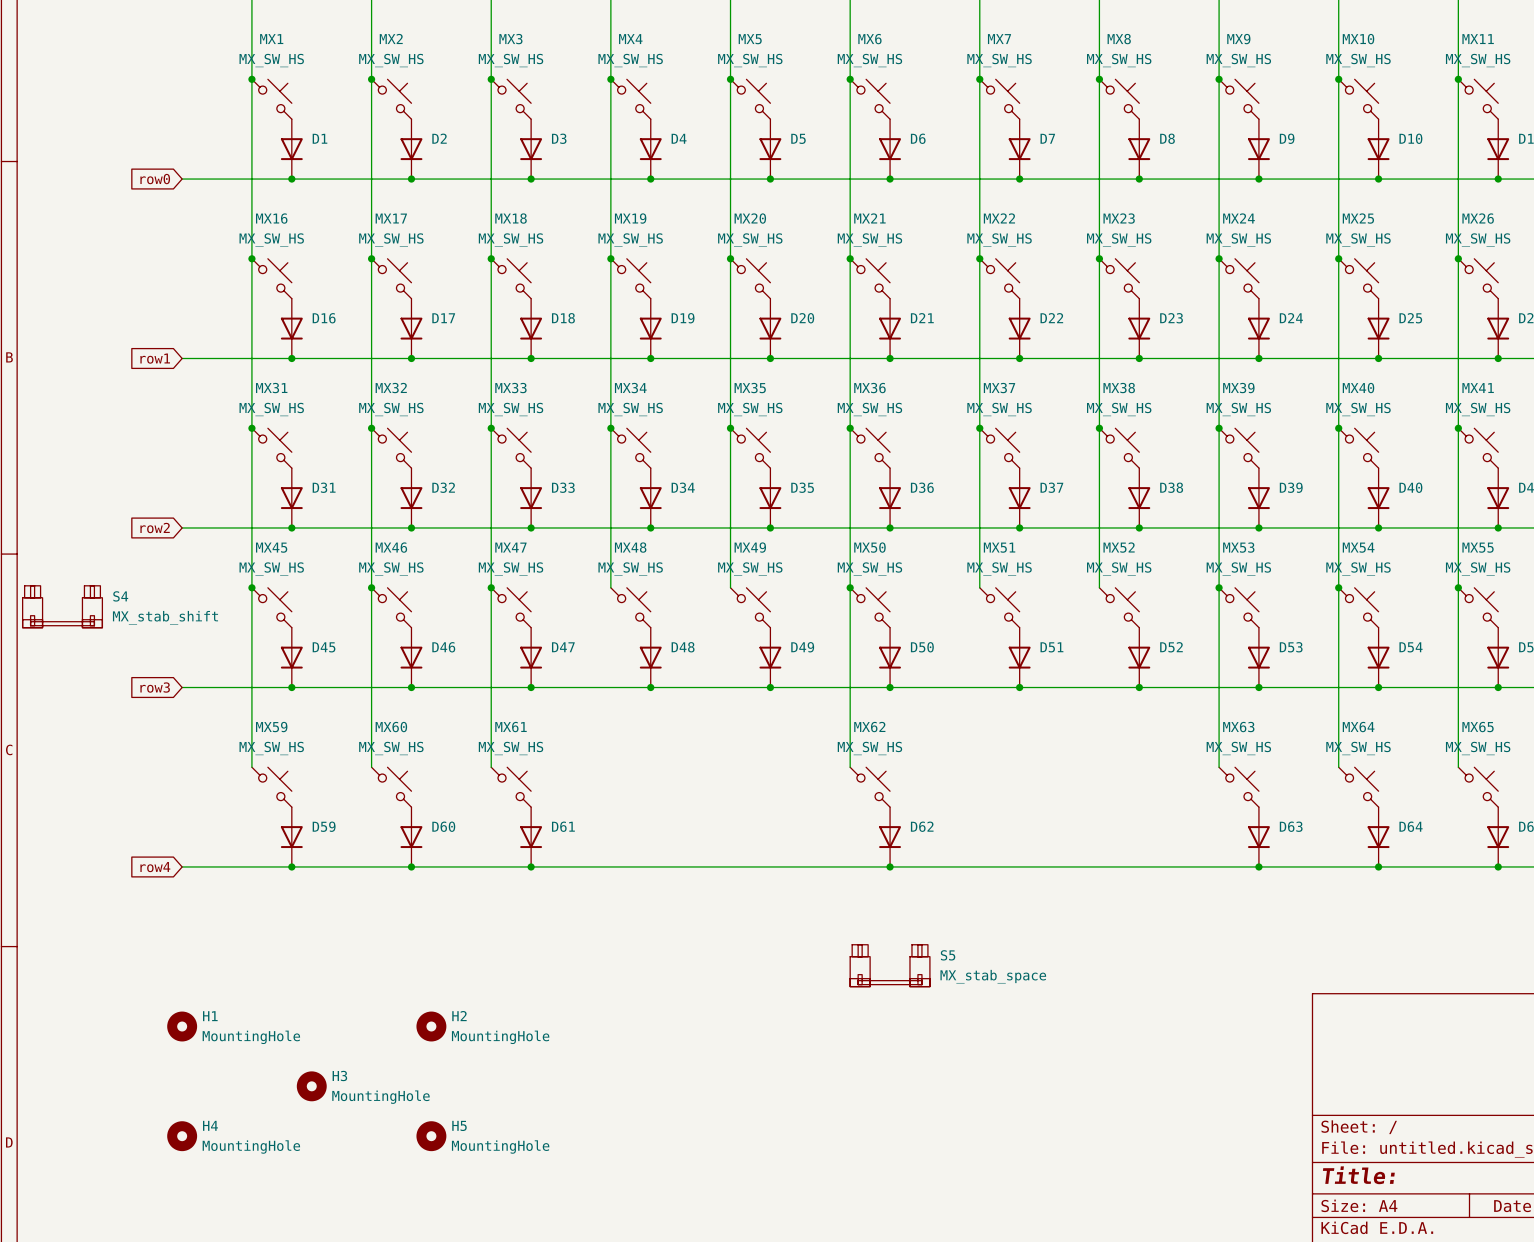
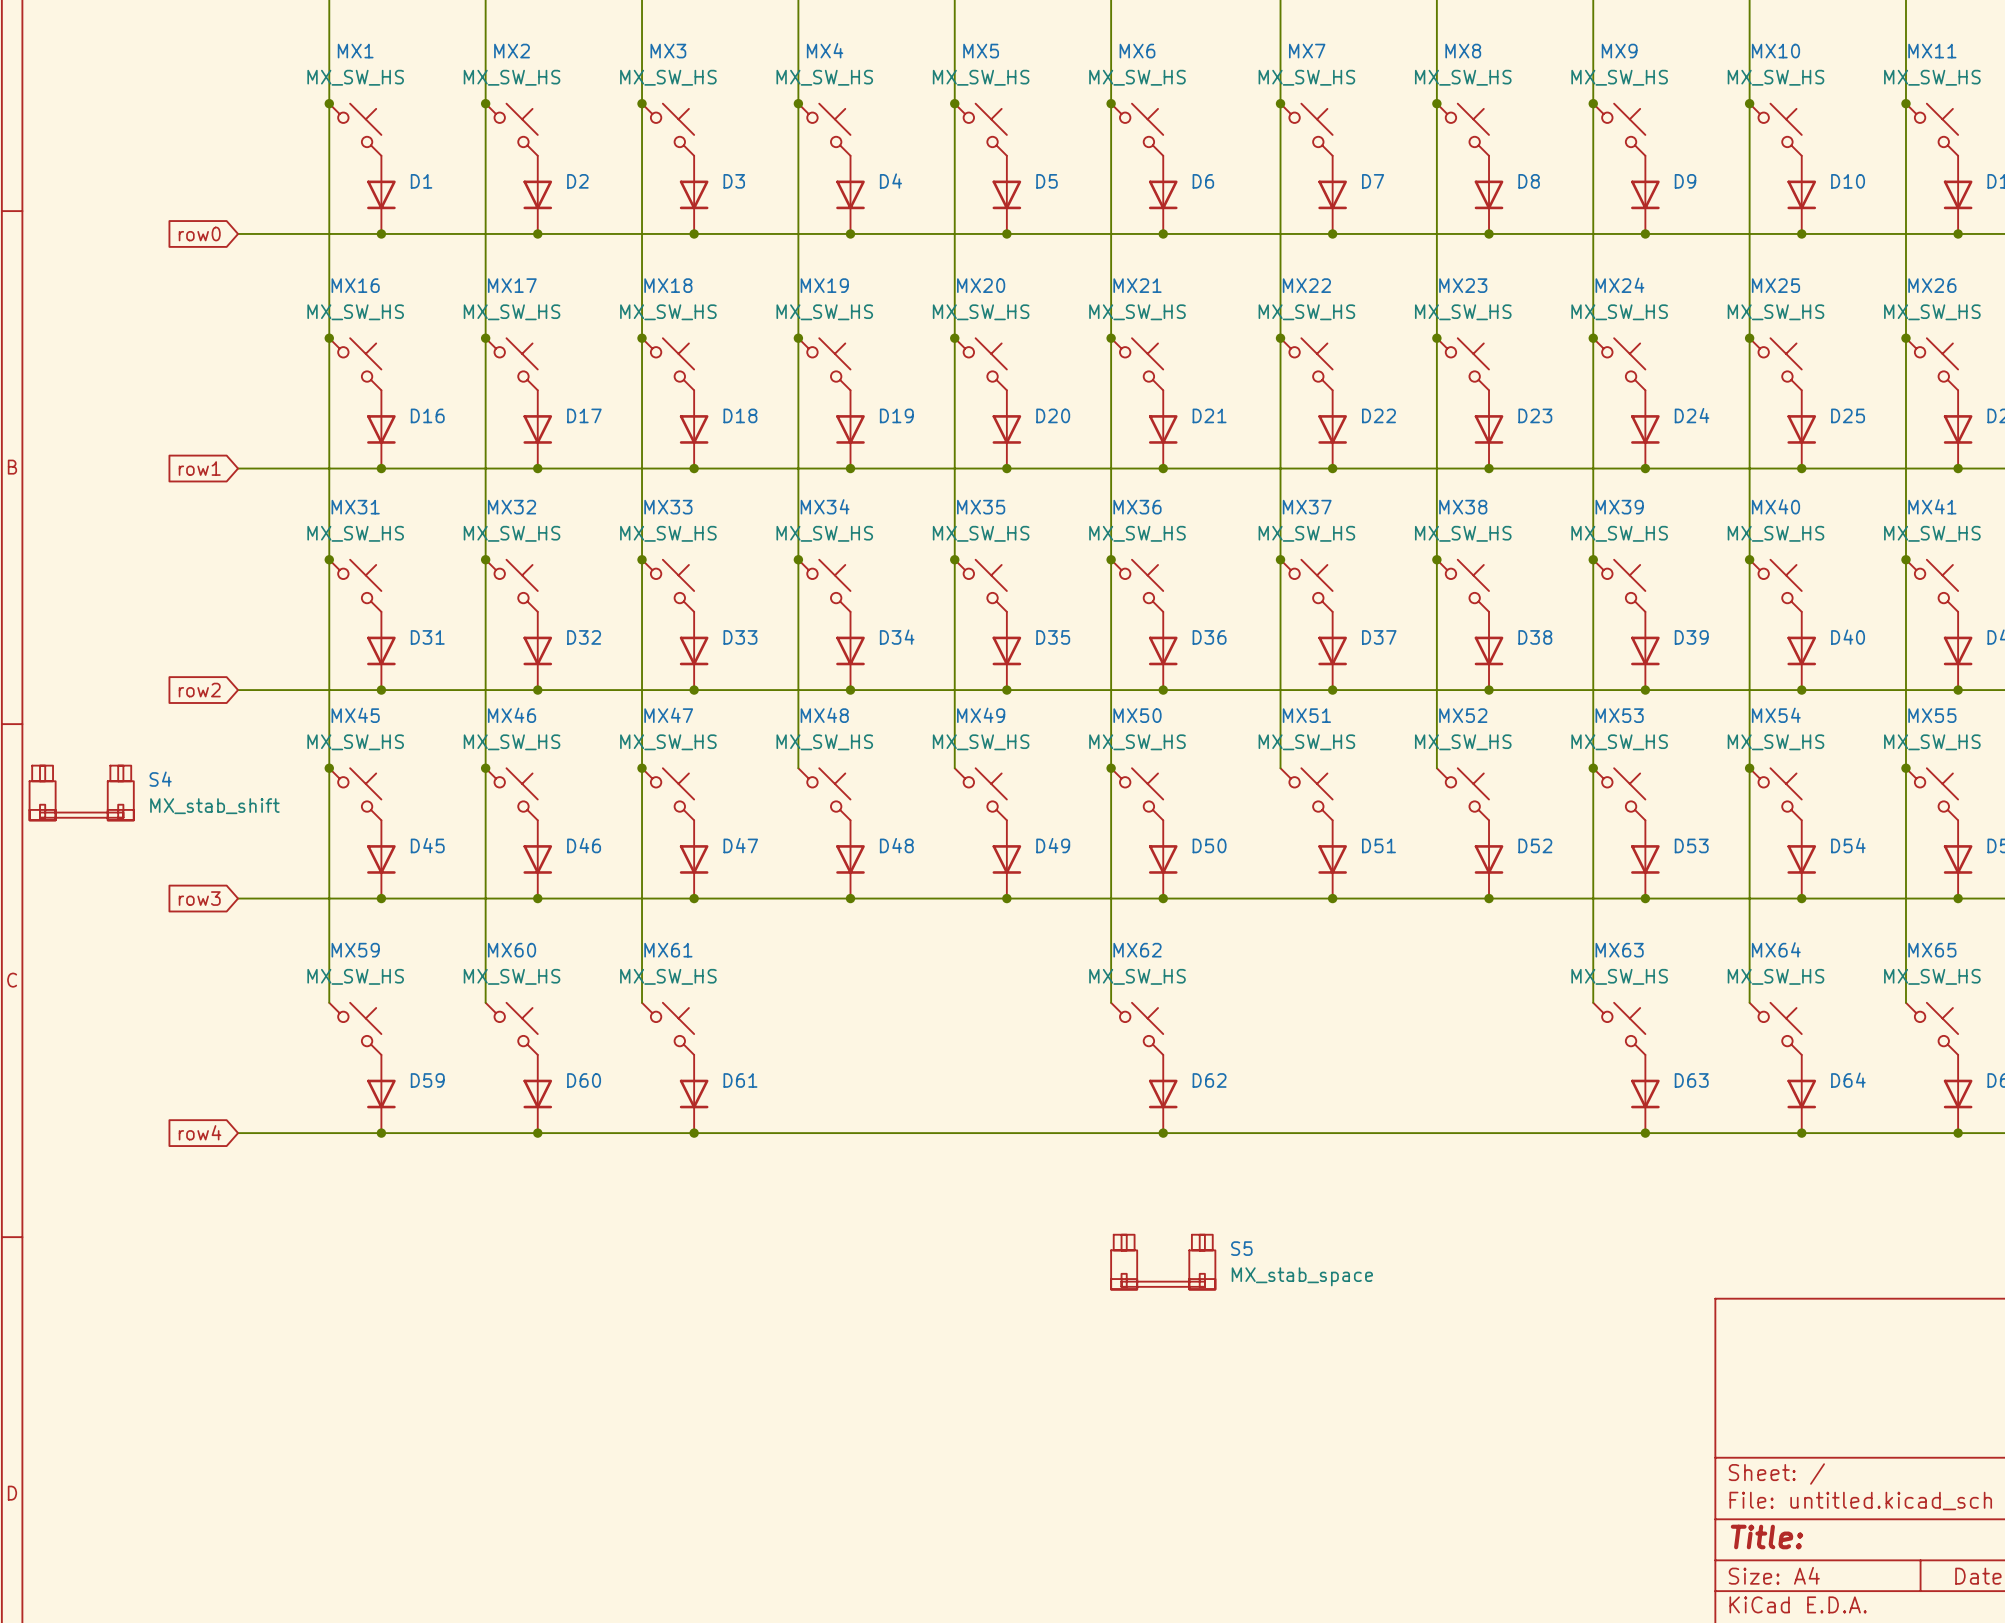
H1: MountingHole (182, 1026) -> none
H2: MountingHole (431, 1026) -> none
H3: MountingHole (311, 1086) -> none
H4: MountingHole (182, 1136) -> none
H5: MountingHole (431, 1136) -> none

